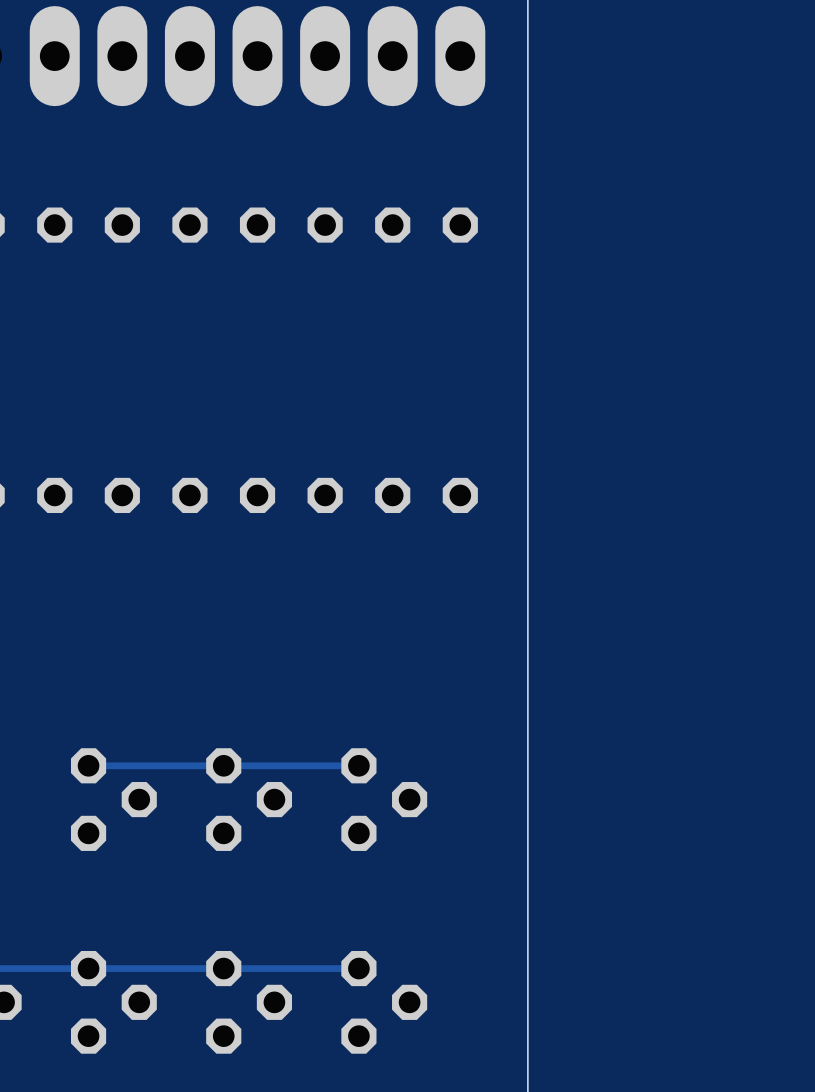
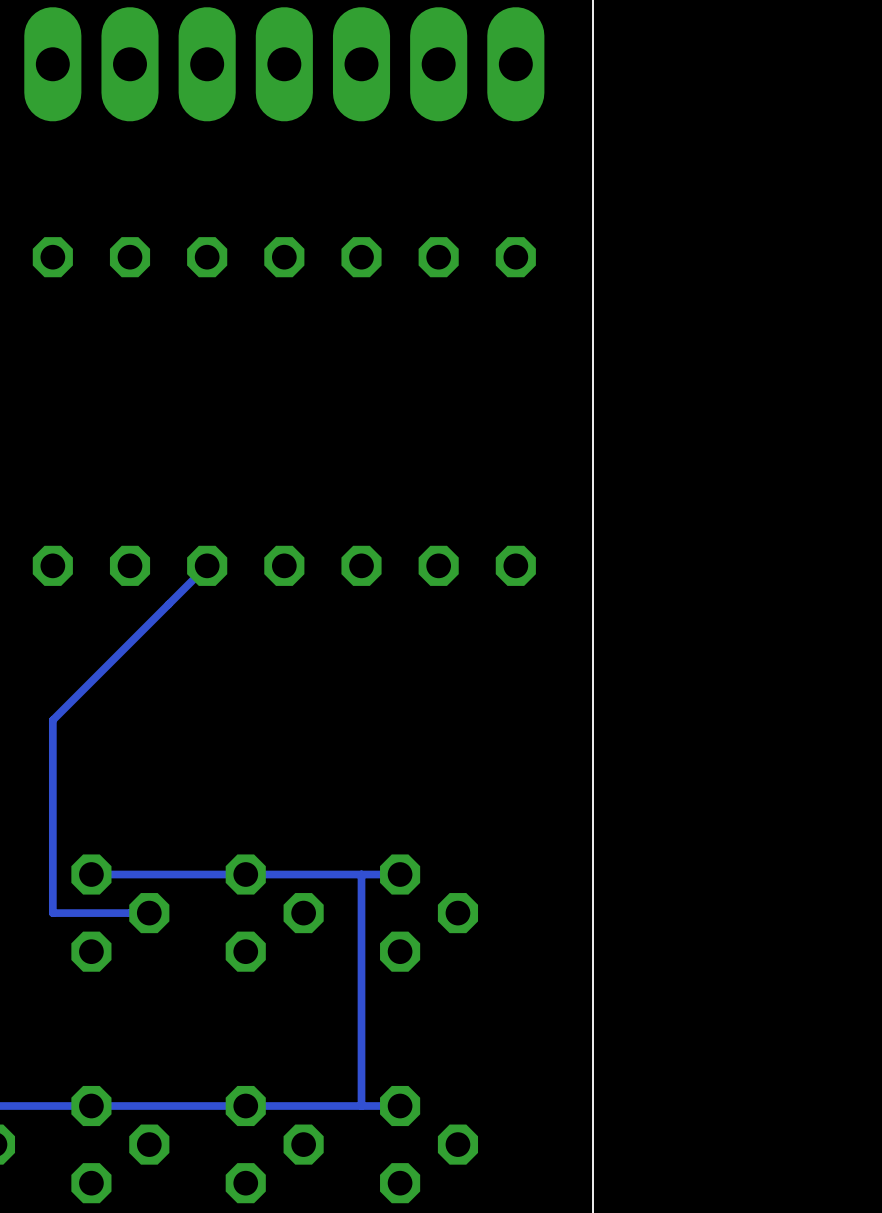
track: none -> (207, 565) (52, 720) (52, 913) (149, 913)
track: none -> (361, 874) (361, 1106)

